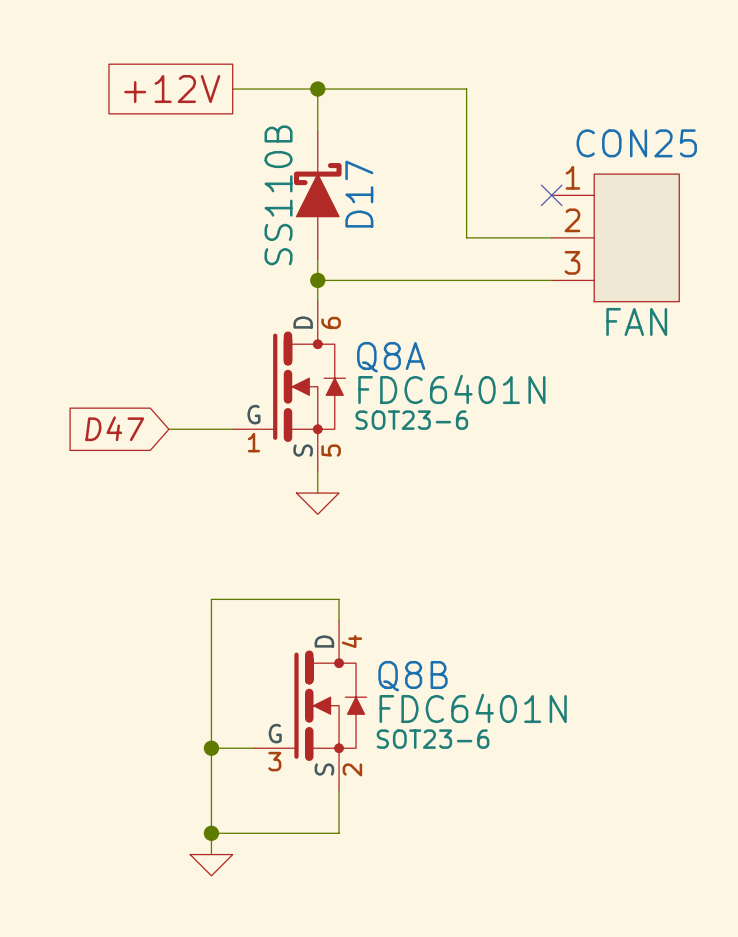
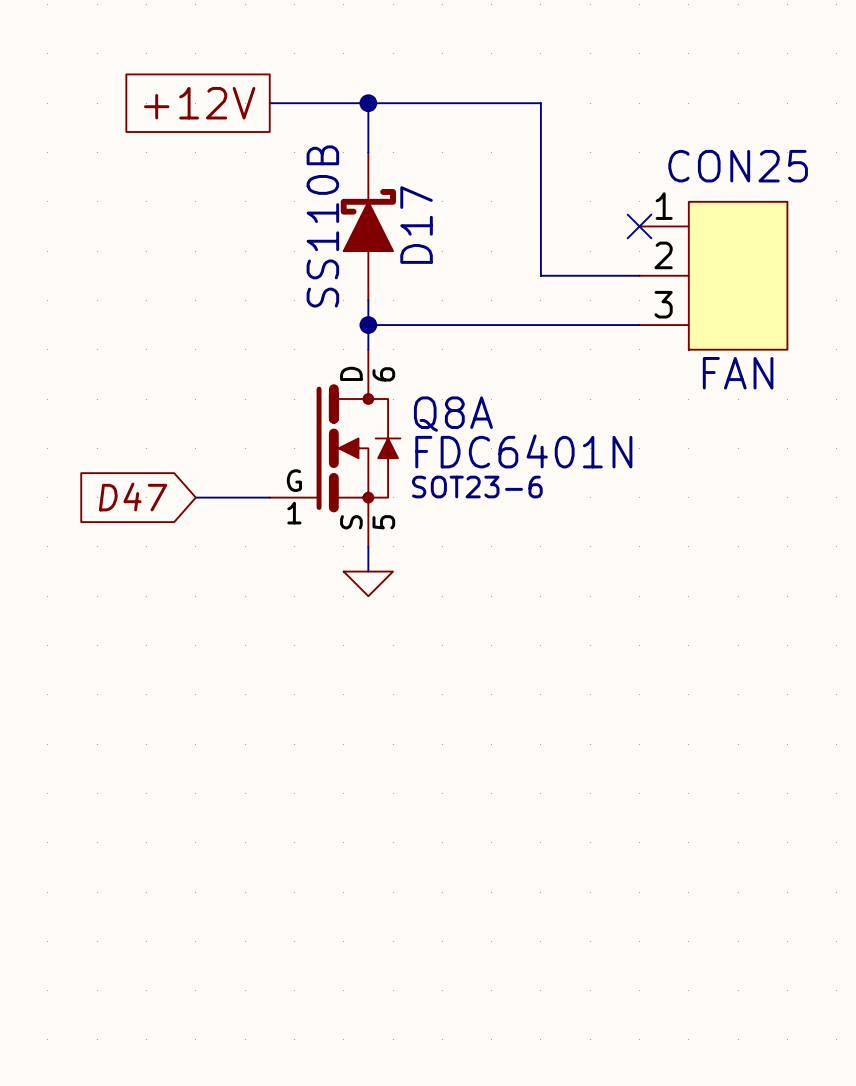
wire: (339, 620) (339, 599) (211, 599) (211, 854) -> none
Q8B: FDC6401N (310, 705) -> none
wire: (211, 748) (253, 748) -> none
junction: (211, 748) -> none
wire: (339, 790) (339, 833) (211, 833) -> none
junction: (211, 833) -> none
power symbol: (211, 865) -> none

